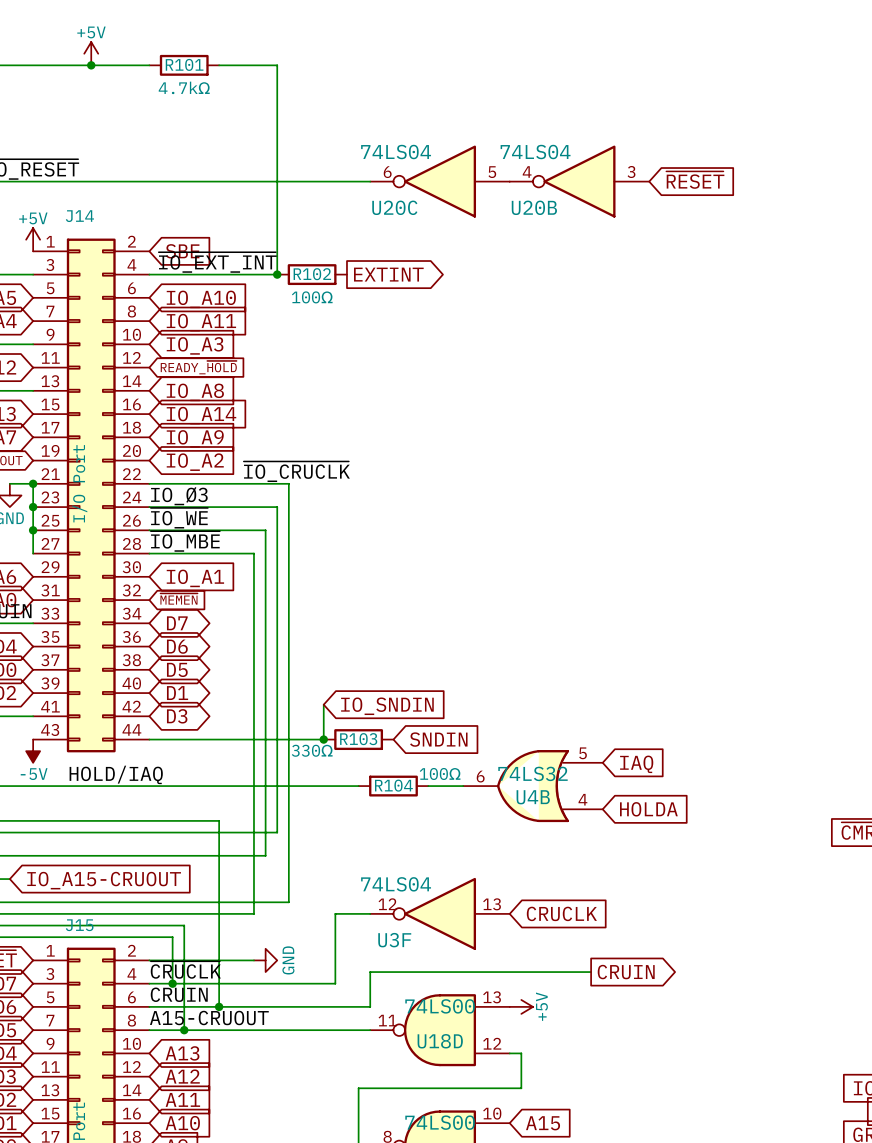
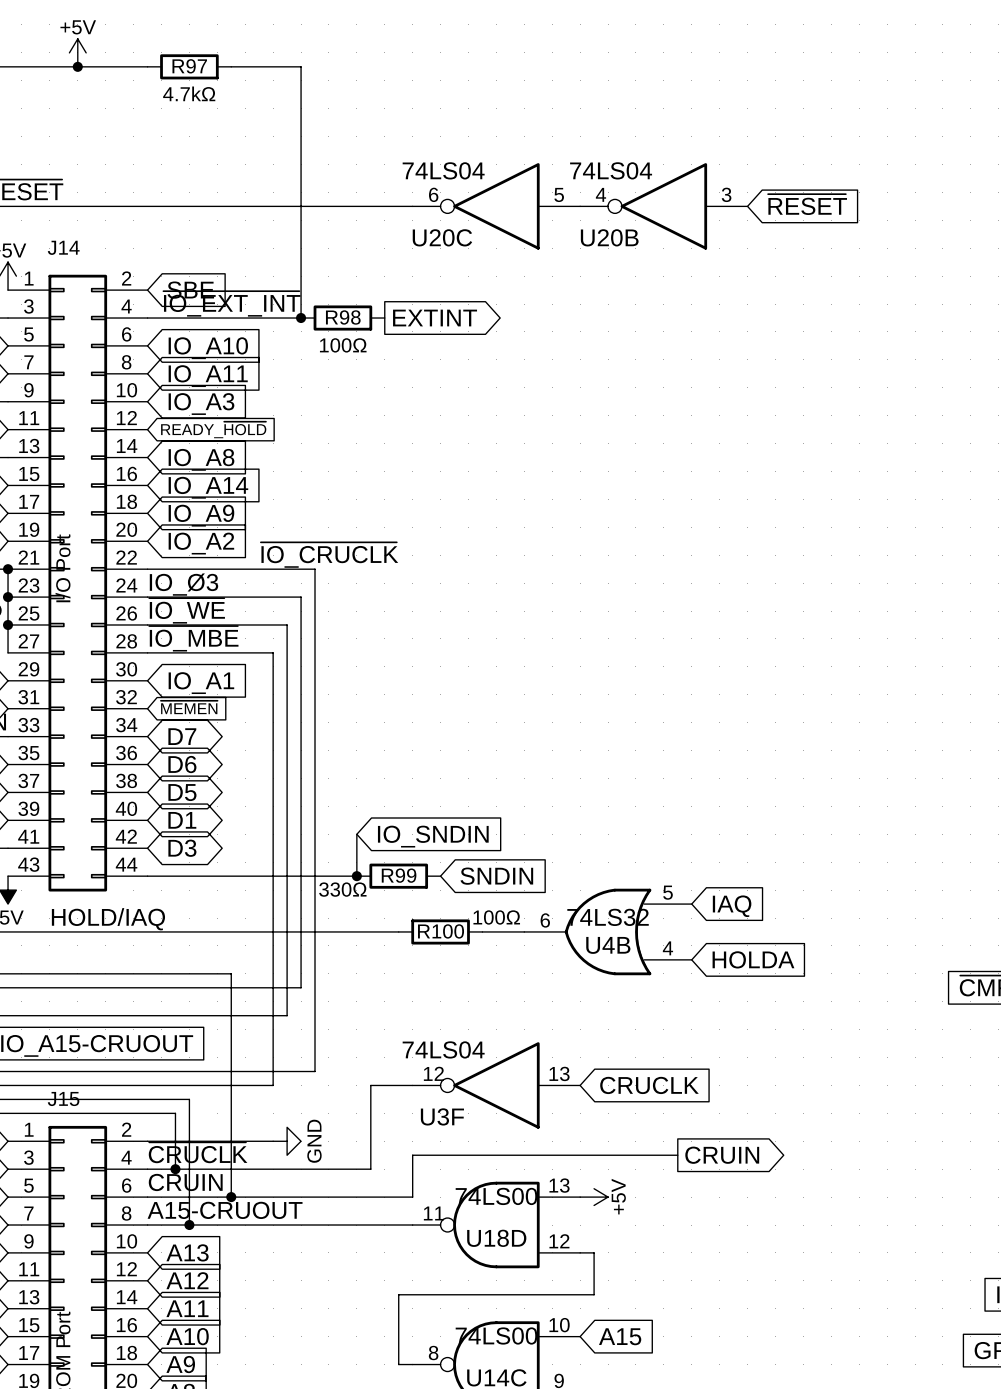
R101 name: R101 (184, 64) -> R97 (189, 66)
R102 name: R102 (312, 274) -> R98 (343, 317)
R103 name: R103 (358, 739) -> R99 (399, 875)
R104 name: R104 (393, 785) -> R100 (441, 931)

